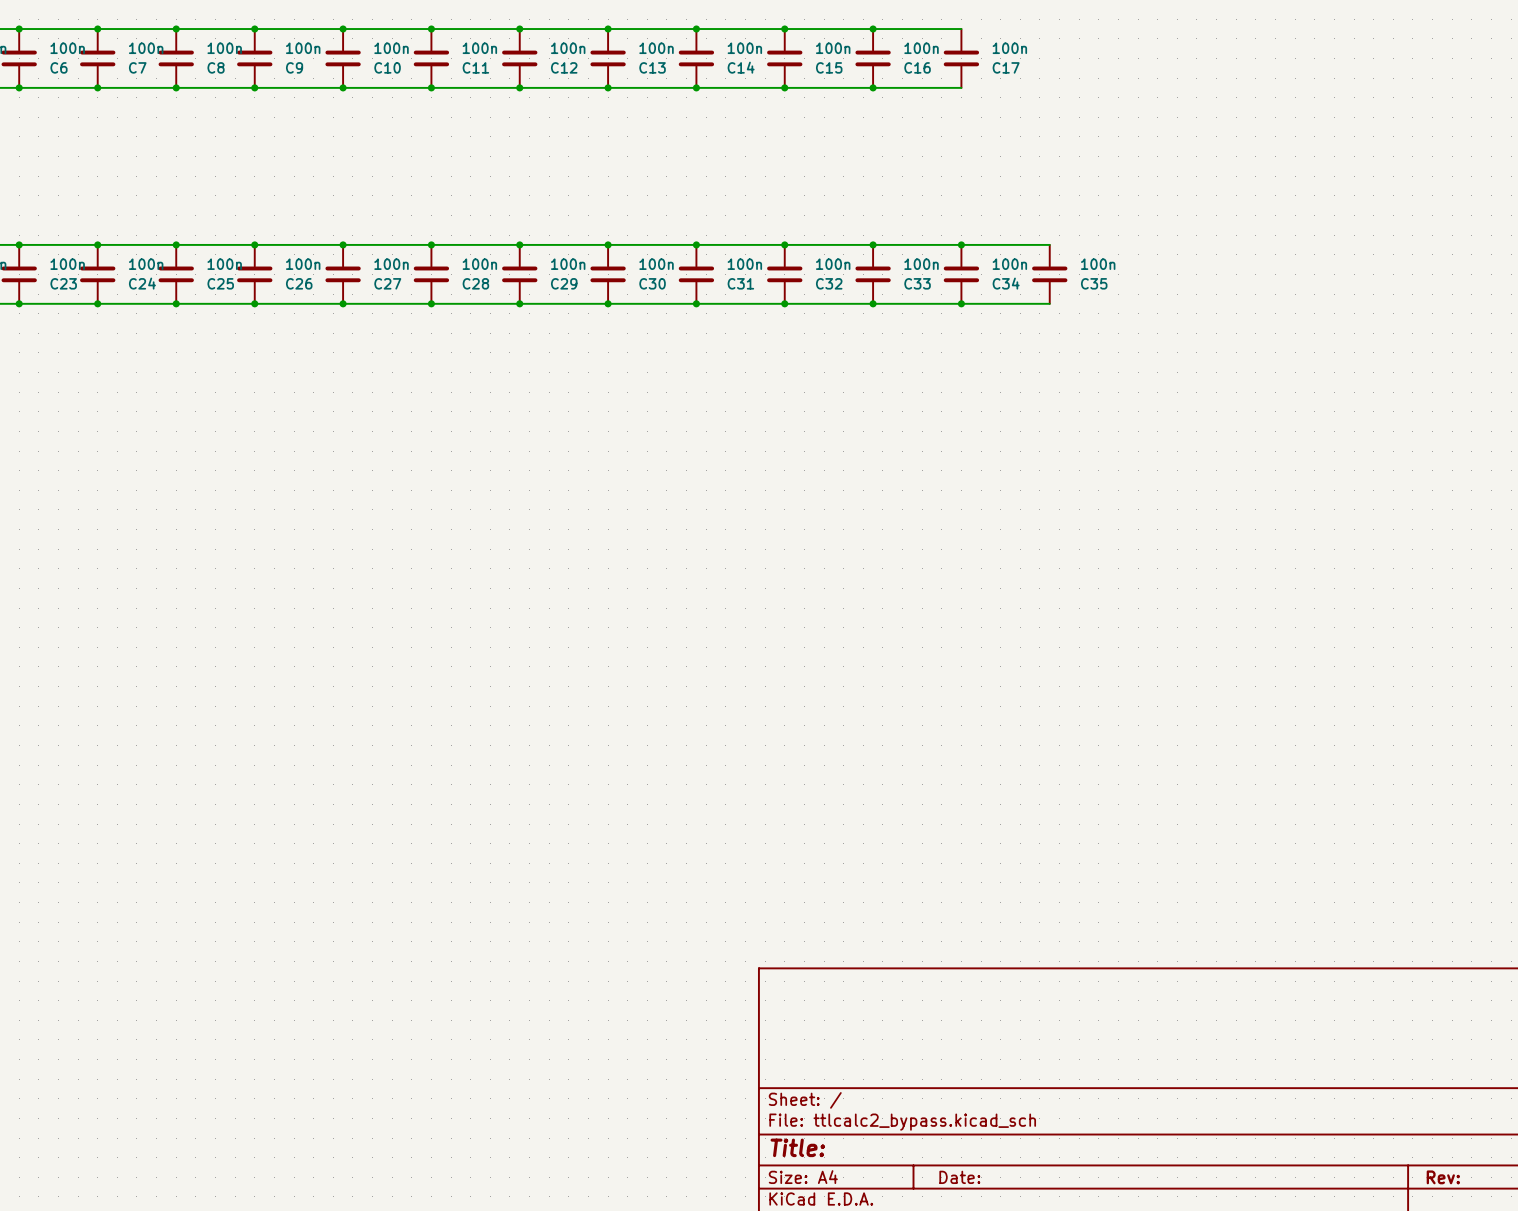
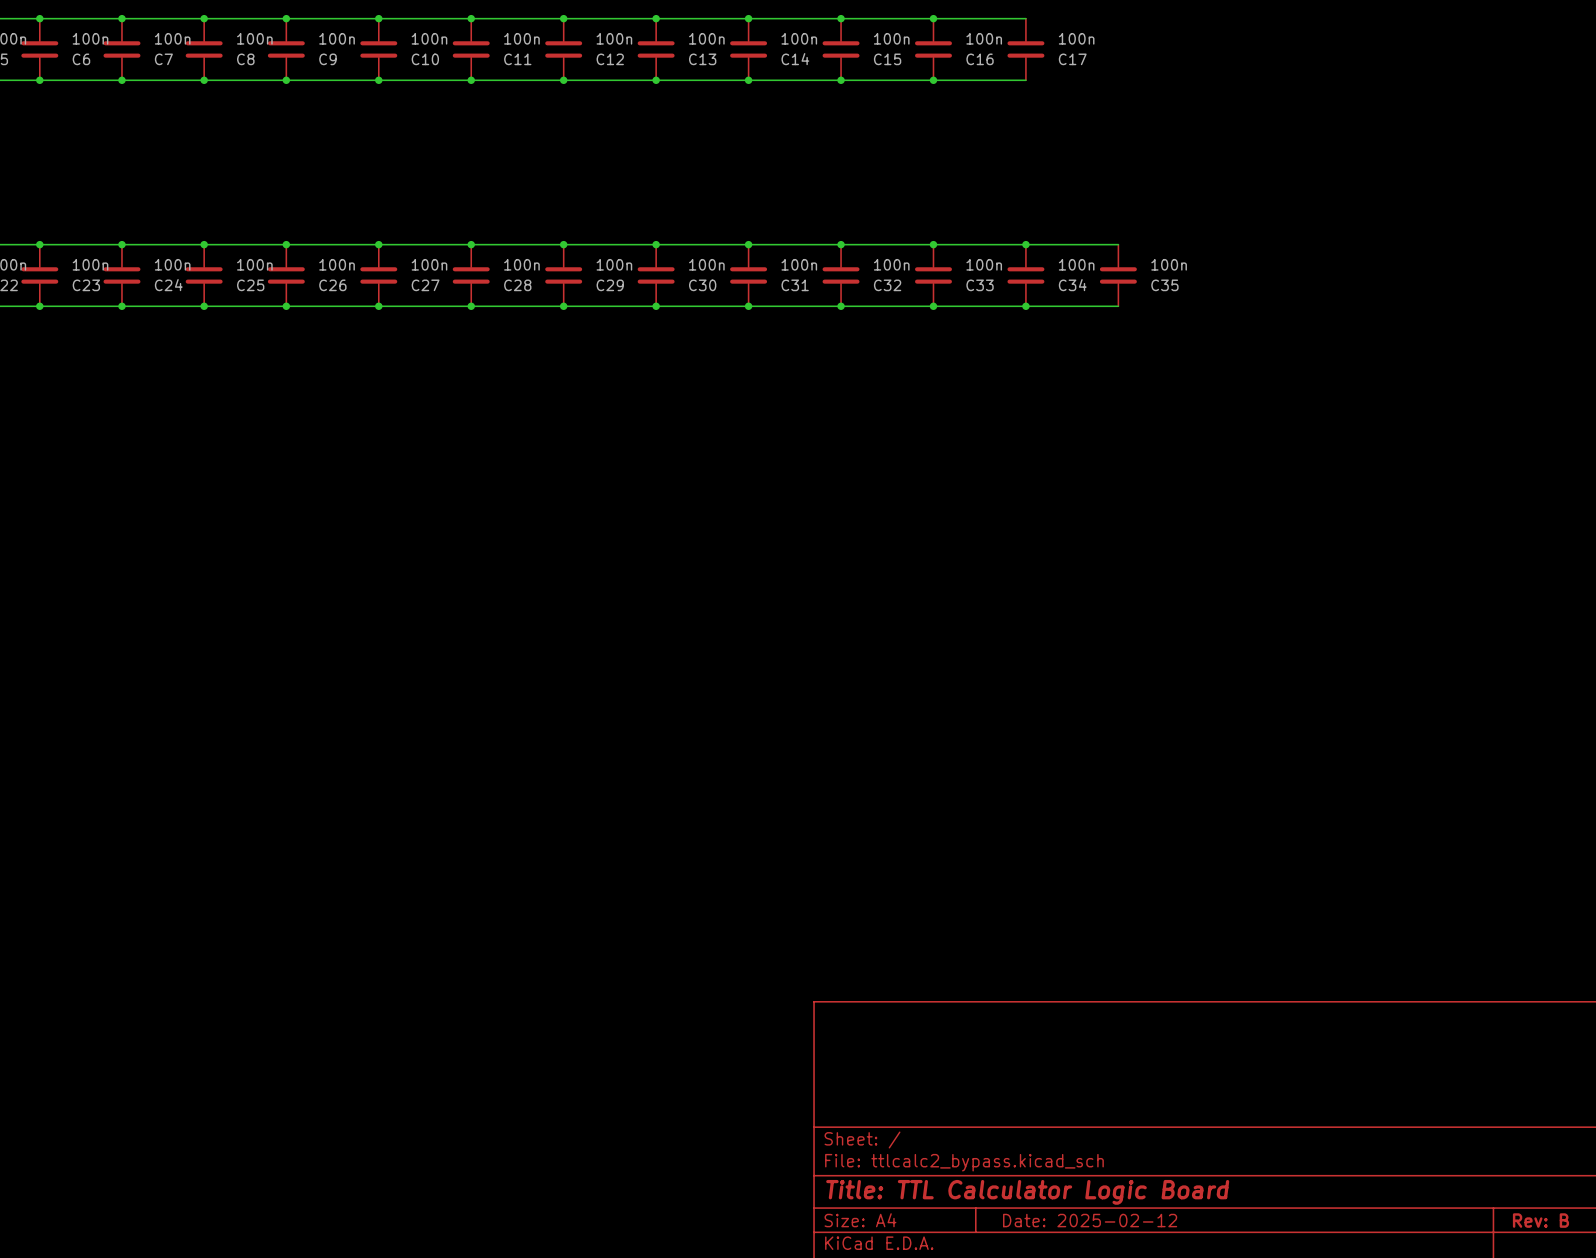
title block: Title: (797, 1147) -> Title: TTL Calculator Logic Board (1027, 1192)
title block: Date: (959, 1177) -> Date: 2025-02-12 (1090, 1220)
title block: Rev: (1443, 1177) -> Rev: B (1540, 1220)

